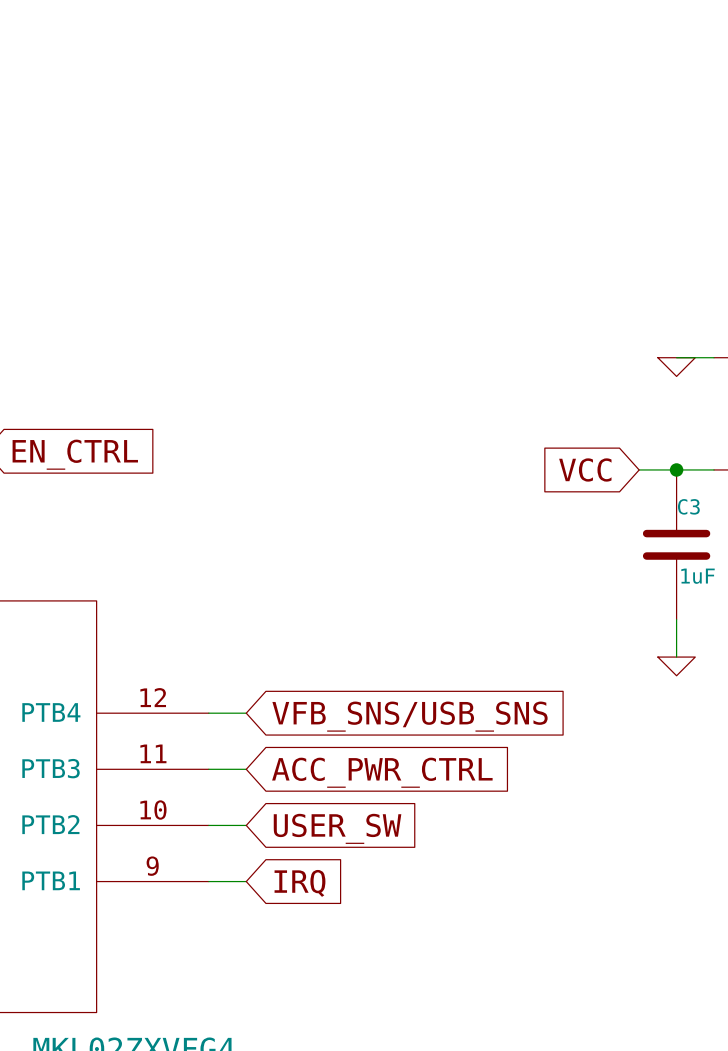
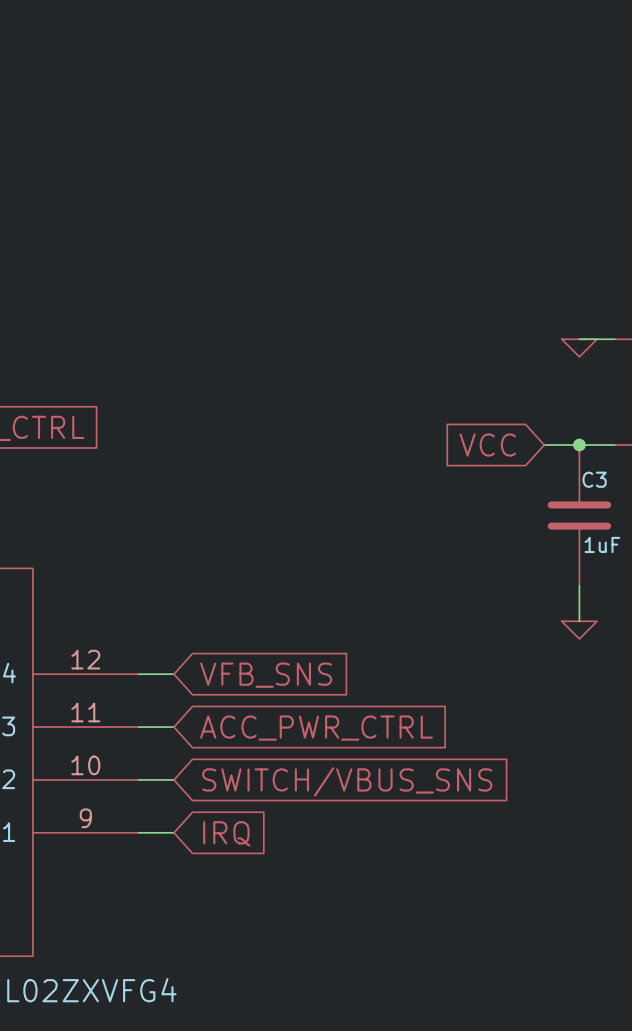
global label: VFB_SNS/USB_SNS (410, 716) -> VFB_SNS (266, 675)
global label: USER_SW (337, 828) -> SWITCH/VBUS_SNS (347, 781)

